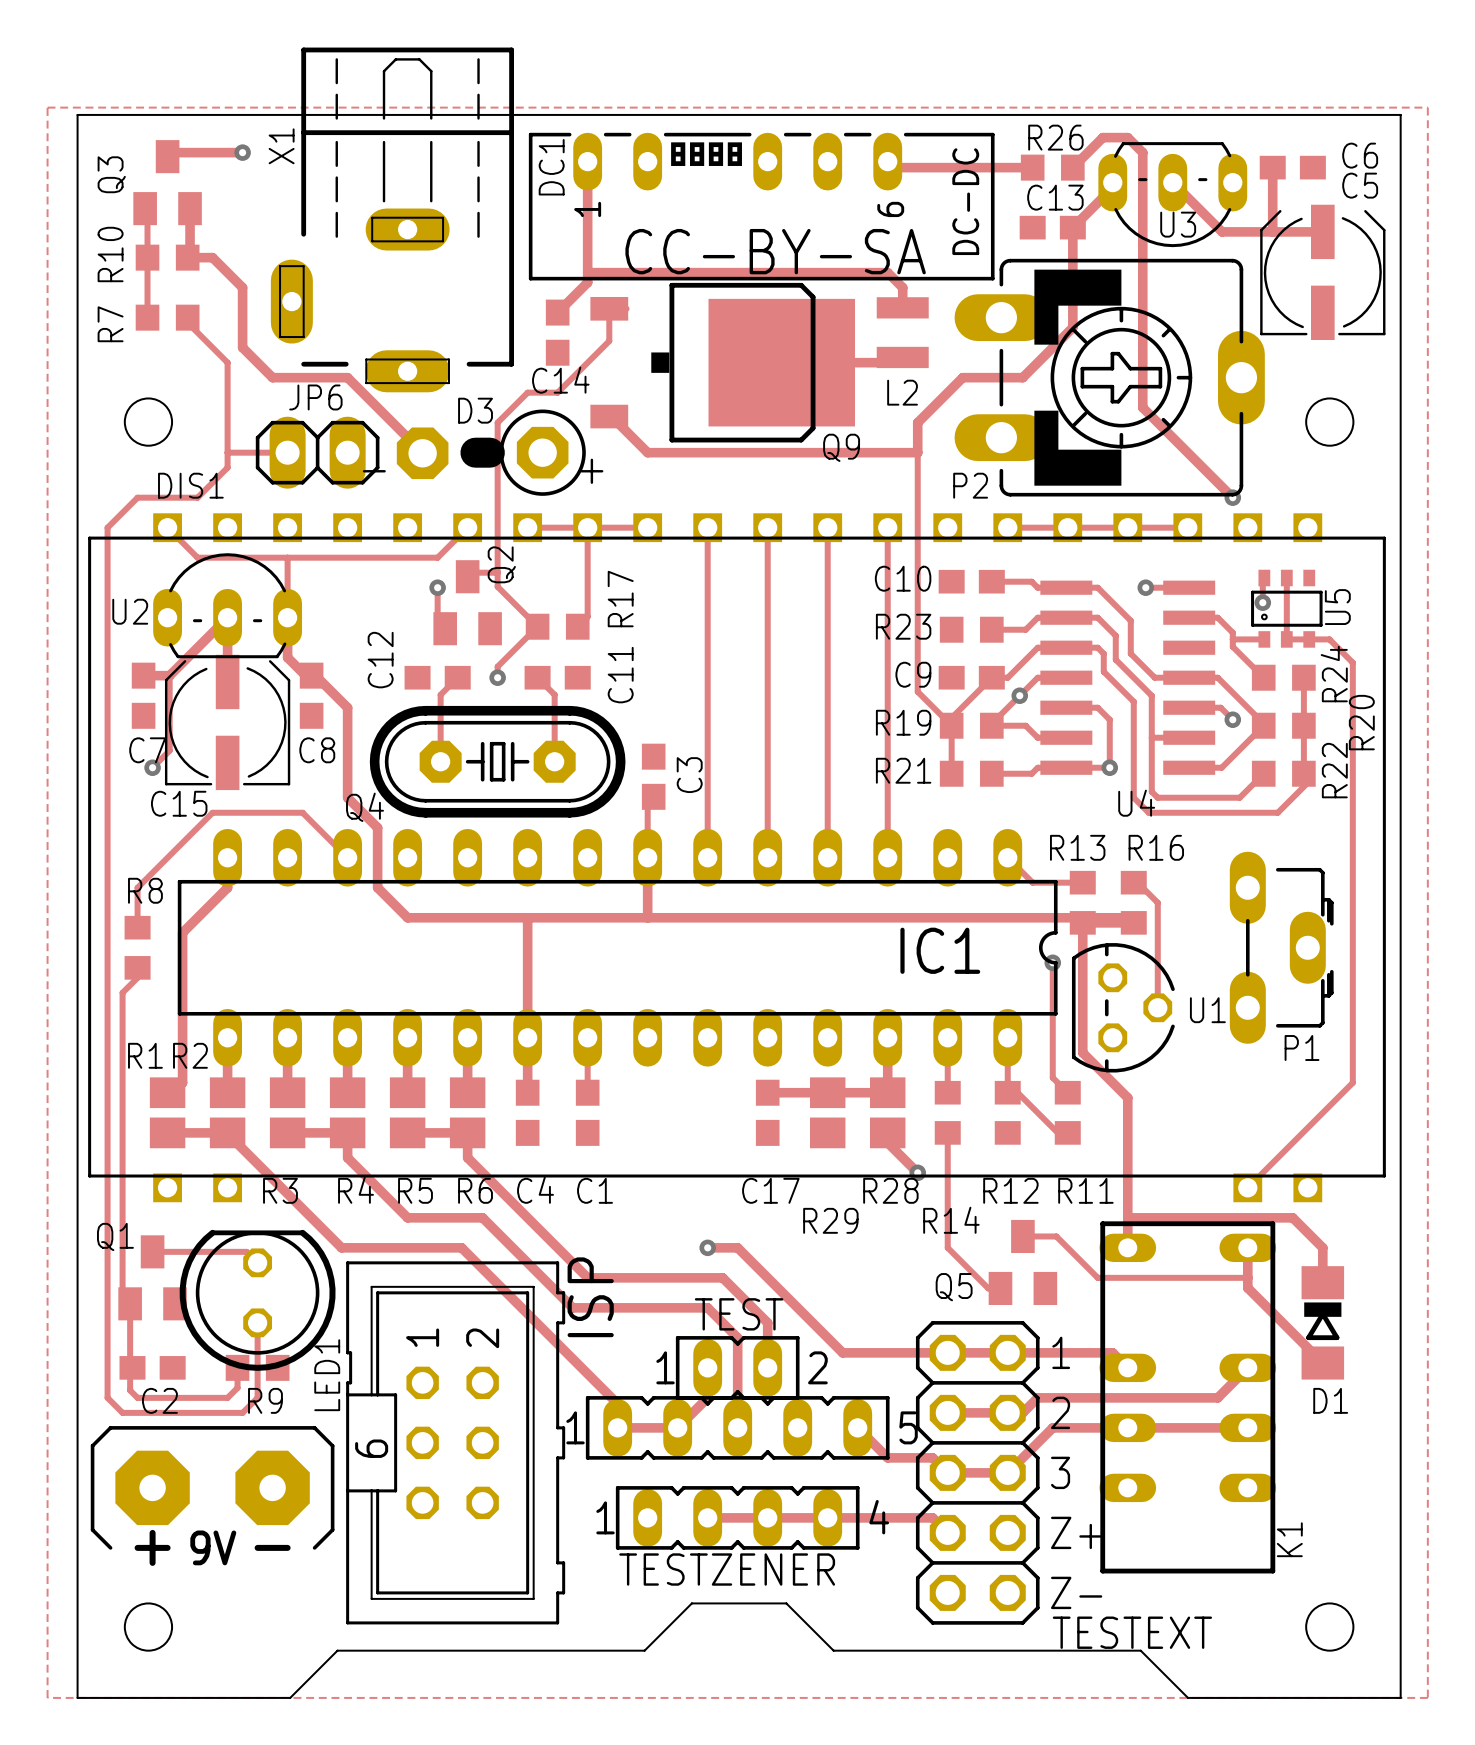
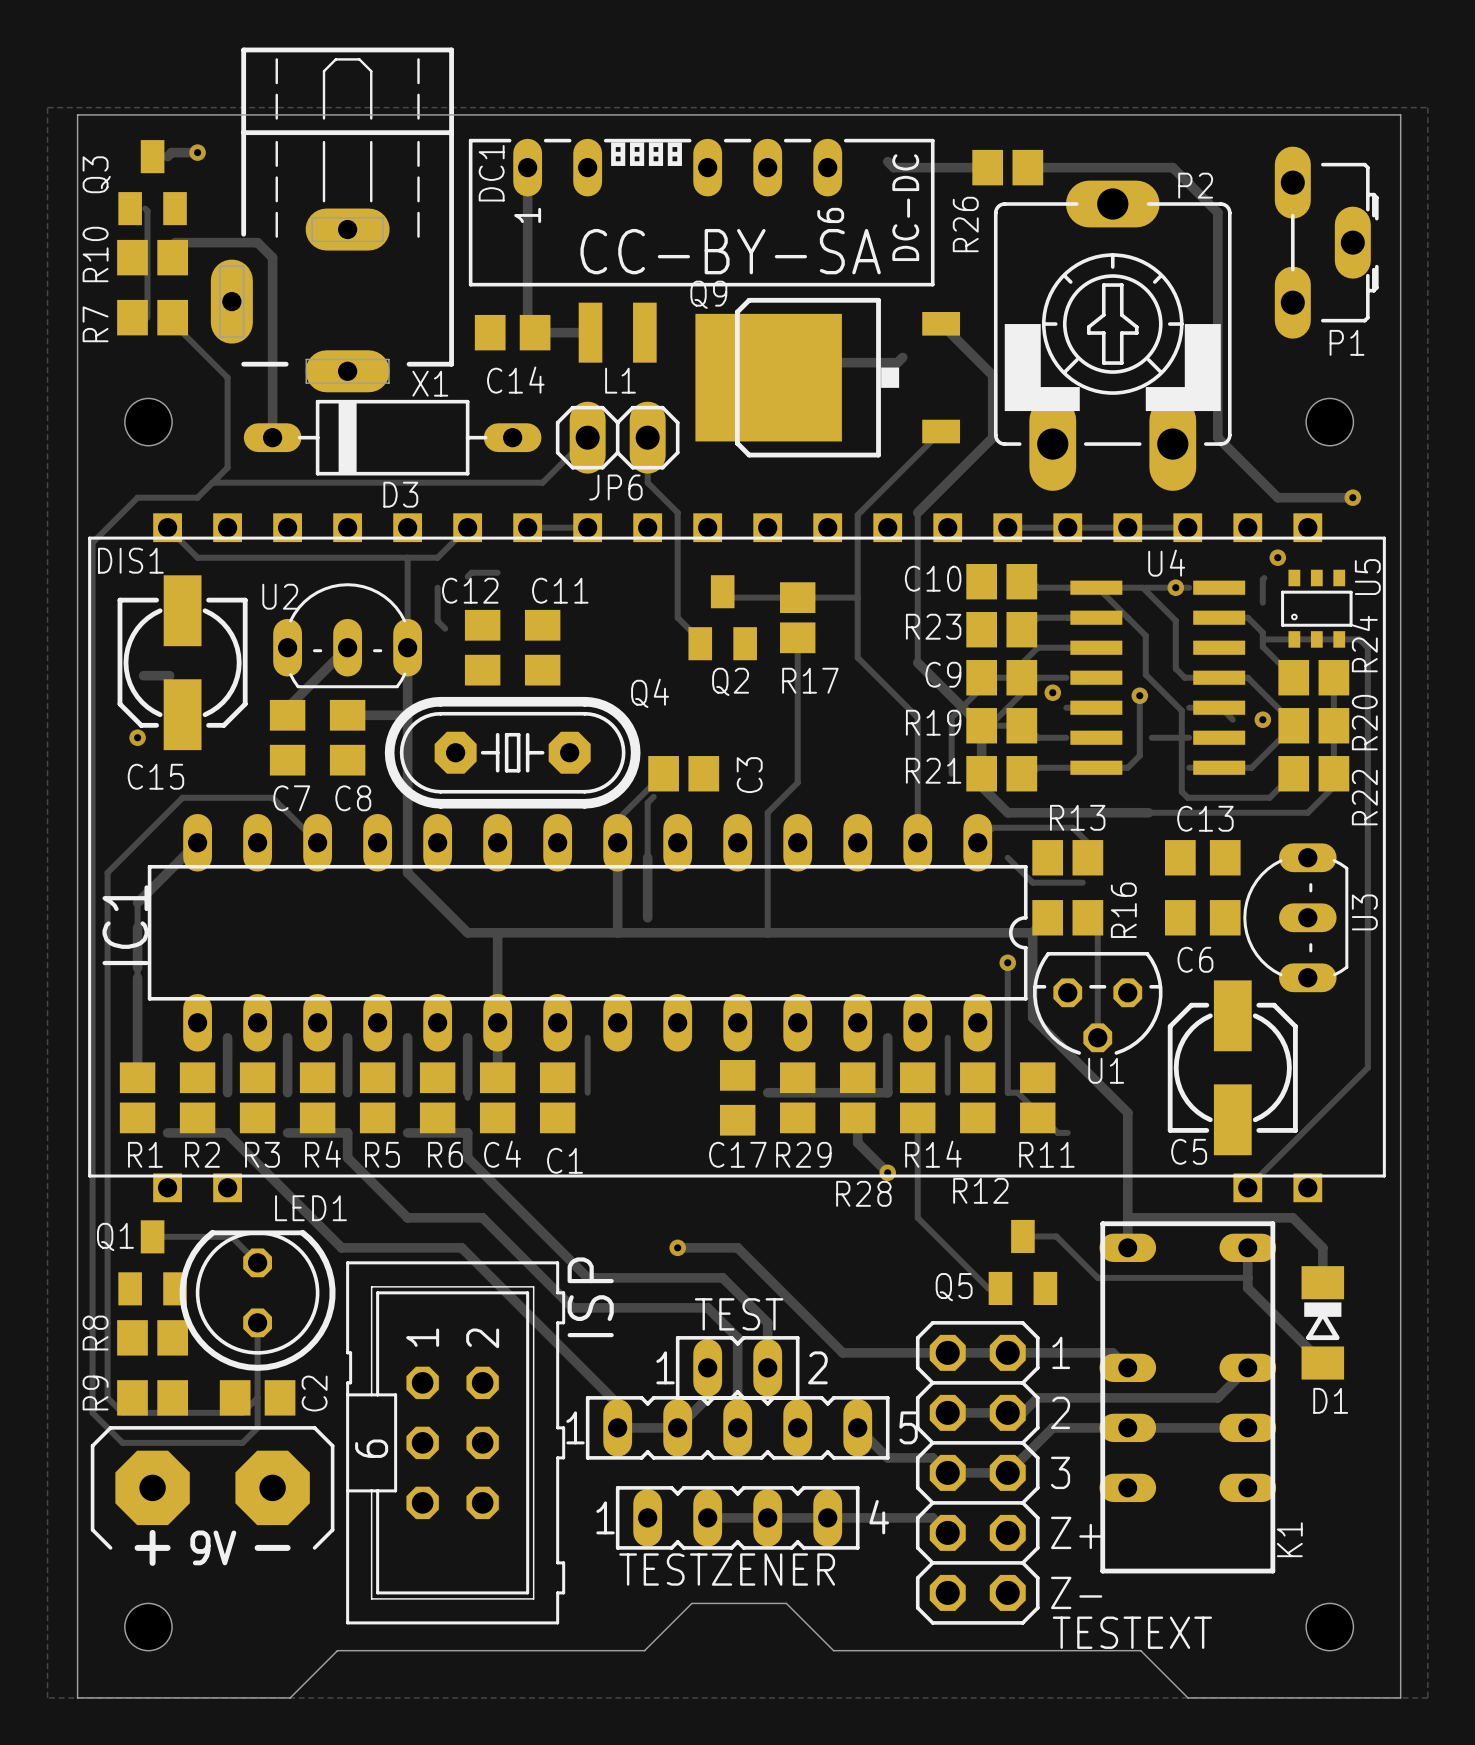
R26 name position: R26 (1055, 137) -> R26 (965, 224)
X1 name rotation: 0° (281, 146) -> 90° clockwise (430, 383)
X1 name position: X1 (281, 146) -> X1 (430, 383)
track: (197, 152) (242, 152) -> none
via position: (242, 152) -> (197, 152)
drawing position: (706, 154) -> (646, 154)
R26 footprint: [1020, 154, 1085, 181] -> [972, 149, 1044, 186]
C6 footprint: [1259, 155, 1326, 180] -> [1164, 900, 1241, 936]
C6 name position: C6 (1360, 155) -> C6 (1195, 959)
track: (587, 161) (587, 282) (557, 312) -> none
track: none -> (527, 167) (527, 325) (535, 332) (590, 332)
track: (987, 167) (1027, 167) -> none
track: none -> (1032, 167) (1172, 167) (1217, 212) (1217, 437) (1277, 497) (1352, 497)
track: (1072, 167) (1102, 137) (1127, 137) (1142, 152) (1142, 407) (1232, 497) -> none
track: (1272, 167) (1272, 231) -> none
Q3 position: (167, 182) -> (152, 182)
track: (1112, 182) (1112, 187) (1072, 227) (1072, 327) (1022, 377) (962, 377) (917, 422) (917, 452) -> none
track: (1172, 182) (1222, 231) (1322, 231) -> none
C5 name position: C5 (1360, 185) -> C5 (1189, 1151)
U3 rotation: 0° (1172, 194) -> 90° clockwise (1295, 917)
U3 position: (1172, 194) -> (1295, 917)
C5 footprint: [1260, 204, 1386, 340] -> [1167, 980, 1298, 1156]
DC1 position: (761, 206) -> (701, 212)
track: (190, 208) (190, 255) (187, 257) (212, 257) (242, 287) (242, 347) (272, 377) (347, 377) (422, 453) -> none
C13 footprint: [1019, 215, 1086, 240] -> [1164, 840, 1241, 876]
X1 position: (392, 219) -> (332, 219)
U3 name position: U3 (1178, 224) -> U3 (1364, 912)
track: none -> (175, 242) (257, 242) (272, 257) (272, 437)
R10 footprint: [135, 244, 200, 271] -> [117, 239, 189, 276]
text position: CC-BY-SA (775, 251) -> CC-BY-SA (730, 251)
R10 name position: R10 (110, 254) -> R10 (95, 254)
track: (587, 272) (887, 272) (902, 287) (902, 307) -> none
C14 footprint: [545, 299, 570, 366] -> [474, 314, 551, 351]
R7 footprint: [135, 304, 200, 331] -> [117, 299, 189, 336]
track: (626, 308) (609, 308) (609, 341) (557, 392) (527, 392) (497, 422) (497, 586) (537, 626) (497, 666) (497, 677) -> none
track: (187, 317) (187, 322) (227, 362) (227, 377) -> (172, 317) (172, 322) (227, 377)
R7 name position: R7 (110, 324) -> R7 (95, 324)
L1: none -> (617, 332)
L2: (902, 332) -> none
Q9 rotation: 0° (722, 362) -> 180° (827, 377)
P2 rotation: 0° (1109, 377) -> 90° counterclockwise (1112, 335)
JP6 name position: JP6 (315, 397) -> JP6 (615, 487)
D3 footprint: [396, 409, 586, 496] -> [243, 399, 542, 476]
D3 name position: D3 (475, 410) -> D3 (400, 494)
track: (609, 416) (611, 416) (647, 452) (917, 452) -> none
track: none -> (941, 431) (857, 514) (857, 657) (917, 717) (917, 842)
track: none -> (587, 437) (542, 482) (212, 482)
track: none -> (647, 437) (647, 482) (677, 512) (677, 617) (700, 640) (700, 643)
track: (227, 452) (287, 452) -> (347, 715) (407, 715)
JP6 position: (317, 452) -> (617, 437)
track: (917, 452) (917, 512) -> (941, 323) (992, 375) (992, 437) (917, 512)
DIS1 name position: DIS1 (190, 485) -> DIS1 (130, 560)
P2 name position: P2 (970, 485) -> P2 (1195, 185)
via: (1232, 497) -> none
via: none -> (1352, 497)
track: (107, 527) (107, 872) -> (317, 842) (272, 797) (182, 797) (107, 872)
track: none -> (107, 527) (92, 542) (92, 1412) (122, 1442) (242, 1442) (257, 1427) (257, 1397)
track: (647, 527) (587, 527) (587, 616) (577, 626) -> none
track: (707, 527) (707, 857) -> none
track: (767, 527) (767, 812) -> (797, 637) (797, 782) (767, 812)
track: (827, 527) (827, 857) -> none
track: (887, 527) (887, 857) -> none
track: (287, 557) (287, 657) (305, 675) (315, 675) (347, 707) (347, 797) (377, 827) (377, 887) (407, 917) (1133, 917) (1133, 922) (1082, 922) -> none
track: none -> (407, 557) (407, 872) (467, 932) (1032, 932)
via: none -> (1277, 557)
Q2 name rotation: 0° (501, 564) -> 90° clockwise (730, 681)
Q2 name position: Q2 (501, 564) -> Q2 (730, 681)
C10 footprint: [938, 569, 1005, 594] -> [966, 563, 1038, 600]
track: (1286, 578) (1286, 639) -> (1264, 639) (1286, 639)
track: (991, 581) (1021, 581) -> none
via: (437, 587) -> none
via position: (1145, 587) -> (1175, 587)
track: none -> (722, 591) (728, 597) (857, 597)
R17 name position: R17 (620, 599) -> R17 (810, 680)
Q2 position: (467, 602) -> (722, 617)
via: (1262, 602) -> none
U2 position: (227, 605) -> (347, 635)
U5 name position: U5 (1337, 607) -> U5 (1367, 577)
U5 position: (1286, 608) -> (1316, 608)
U2 name position: U2 (130, 611) -> U2 (280, 596)
R17 footprint: [525, 613, 590, 640] -> [779, 582, 816, 654]
R23 footprint: [939, 616, 1004, 643] -> [966, 612, 1038, 648]
track: (1097, 617) (1115, 635) (1115, 659) (1151, 695) (1151, 791) (1157, 797) (1187, 797) -> (1130, 620) (1145, 635) (1145, 674) (1181, 710) (1181, 791) (1187, 797)
track: (1189, 617) (1217, 617) (1232, 632) (1232, 646) (1263, 677) -> (1219, 617) (1247, 617) (1262, 632) (1262, 646) (1293, 677)
track: (1130, 620) (1130, 653) (1154, 677) (1184, 677) -> (1097, 587) (1142, 587) (1175, 620) (1175, 668) (1184, 677)
track: (991, 629) (1021, 629) -> none
track: (1232, 639) (1262, 639) -> none
track: (1329, 639) (1352, 662) (1352, 1082) -> (1329, 639) (1359, 639) (1367, 647) (1367, 1067) (1352, 1082)
track: none -> (347, 647) (287, 707) (287, 715)
track: (1096, 647) (1103, 653) (1103, 671) (1133, 701) (1133, 797) (1148, 812) -> (917, 662) (981, 726) (981, 786) (1007, 812) (1148, 812)
C15 footprint: [164, 654, 291, 791] -> [117, 575, 248, 751]
C12 name position: C12 (380, 660) -> C12 (470, 590)
C7 footprint: [131, 662, 156, 729] -> [269, 699, 306, 776]
C8 footprint: [299, 662, 324, 729] -> [329, 699, 366, 776]
track: (917, 662) (917, 691) (951, 725) -> none
R24 footprint: [1251, 664, 1316, 691] -> [1278, 660, 1350, 696]
C12 footprint: [404, 665, 471, 690] -> [464, 609, 501, 686]
C11 footprint: [524, 665, 591, 690] -> [524, 609, 561, 686]
C9 footprint: [938, 665, 1005, 690] -> [966, 660, 1038, 696]
C11 name position: C11 (620, 675) -> C11 (560, 590)
track: (457, 677) (440, 694) (440, 761) -> none
via: (497, 677) -> none
track: (537, 677) (554, 694) (554, 761) -> none
U4 position: (1127, 677) -> (1157, 677)
track: (1217, 677) (1263, 723) (1221, 767) -> (1217, 677) (1247, 677) (1293, 723) (1251, 767) (1221, 767)
track: (1303, 677) (1303, 773) (1307, 771) (1307, 782) (1277, 812) -> (1333, 677) (1333, 786) (1307, 812) (1277, 812)
track: (227, 681) (227, 617) (169, 675) (169, 750) (152, 767) -> none
via position: (1019, 695) -> (1052, 692)
via: none -> (1139, 695)
track: (1097, 707) (1109, 719) (1109, 767) -> (1139, 695) (1139, 755) (1127, 767) (1109, 767)
R19 footprint: [939, 712, 1004, 739] -> [966, 708, 1038, 744]
R20 footprint: [1251, 712, 1316, 739] -> [1278, 708, 1350, 744]
via position: (1232, 719) -> (1262, 719)
C3 footprint: [641, 743, 666, 810] -> [648, 756, 720, 792]
R21 footprint: [939, 760, 1004, 787] -> [966, 756, 1038, 792]
R22 footprint: [1251, 760, 1316, 787] -> [1278, 756, 1350, 792]
Q4 position: (497, 761) -> (512, 752)
via position: (152, 767) -> (137, 737)
via: (1109, 767) -> none
track: none -> (663, 773) (617, 819) (617, 932)
track: (991, 773) (1021, 773) -> (677, 1247) (707, 1247)
track: (1263, 773) (1239, 797) -> (1293, 773) (1269, 797) (1239, 797)
U4 name position: U4 (1136, 803) -> U4 (1166, 563)
Q4 name position: Q4 (365, 807) -> Q4 (650, 693)
track: none -> (977, 842) (992, 827) (1072, 827) (1087, 842) (1087, 857)
R16 name position: R16 (1156, 847) -> R16 (1123, 910)
track: (227, 857) (227, 887) (182, 932) (182, 1082) (167, 1097) (167, 1092) -> none
track: (347, 857) (302, 812) (212, 812) (137, 887) (137, 902) -> (197, 842) (137, 902)
track: none -> (767, 857) (767, 932)
R13 footprint: [1069, 870, 1096, 935] -> [1032, 840, 1104, 876]
R16 footprint: [1120, 870, 1147, 935] -> [1032, 900, 1104, 936]
track: (1133, 882) (1137, 882) (1157, 902) (1157, 1007) -> none
R8 name position: R8 (145, 890) -> R8 (95, 1332)
R8 footprint: [124, 915, 151, 980] -> [117, 1320, 189, 1356]
track: (527, 917) (527, 1092) -> none
track: (1082, 917) (1082, 1052) (1127, 1097) (1127, 1112) -> (1032, 932) (1032, 1017) (1127, 1112)
track: none -> (137, 927) (137, 967)
track: none -> (1087, 927) (1087, 917) (1097, 927) (1097, 1037)
track: none -> (497, 932) (497, 1077)
IC1 position: (617, 947) -> (587, 932)
P1 position: (1281, 947) -> (1326, 242)
IC1 name rotation: 0° (940, 950) -> 90° counterclockwise (125, 925)
IC1 name position: IC1 (940, 950) -> IC1 (125, 925)
track: none -> (1007, 962) (1007, 1037)
track: (1052, 962) (1052, 1077) (1067, 1092) -> none
via position: (1052, 962) -> (1007, 962)
track: (137, 977) (122, 992) (122, 1296) (130, 1303) (130, 1390) (137, 1397) (227, 1397) (237, 1387) (237, 1367) -> (137, 977) (137, 1077)
U1 rotation: 0° (1123, 1007) -> 90° clockwise (1097, 1003)
R1 name position: R1 (145, 1055) -> R1 (145, 1154)
R2 name position: R2 (190, 1055) -> R2 (202, 1154)
C4 footprint: [515, 1079, 540, 1146] -> [479, 1062, 516, 1134]
C1 footprint: [575, 1079, 600, 1146] -> [539, 1062, 576, 1134]
C17 footprint: [755, 1079, 780, 1146] -> [719, 1060, 756, 1136]
R14 footprint: [934, 1080, 961, 1145] -> [900, 1062, 936, 1134]
R12 footprint: [994, 1080, 1021, 1145] -> [960, 1062, 996, 1134]
R11 footprint: [1054, 1080, 1081, 1145] -> [1020, 1062, 1056, 1134]
R1 position: (167, 1112) -> (137, 1097)
R2 position: (227, 1112) -> (197, 1097)
R3 position: (287, 1112) -> (257, 1097)
R4 position: (347, 1112) -> (317, 1097)
R5 position: (407, 1112) -> (377, 1097)
R6 position: (467, 1112) -> (437, 1097)
R29 position: (827, 1112) -> (797, 1097)
R28 position: (887, 1112) -> (857, 1097)
track: none -> (857, 1117) (857, 1142) (887, 1172)
track: (887, 1132) (887, 1142) (917, 1172) -> none
track: (947, 1132) (947, 1247) -> (917, 1117) (917, 1217) (947, 1247)
via position: (917, 1172) -> (887, 1172)
R3 name position: R3 (280, 1190) -> R3 (262, 1154)
R4 name position: R4 (356, 1190) -> R4 (322, 1154)
R5 name position: R5 (415, 1190) -> R5 (382, 1154)
R6 name position: R6 (475, 1190) -> R6 (445, 1154)
R28 name position: R28 (890, 1190) -> R28 (863, 1193)
R29 name position: R29 (830, 1220) -> R29 (803, 1154)
R14 name position: R14 (951, 1220) -> R14 (933, 1154)
via position: (707, 1247) -> (677, 1247)
track: (152, 1251) (246, 1251) -> (152, 1236) (231, 1236) (246, 1251)
Q1 position: (152, 1277) -> (152, 1262)
R9 footprint: [225, 1354, 290, 1381] -> [117, 1380, 189, 1416]
C2 footprint: [119, 1356, 186, 1380] -> [219, 1380, 296, 1416]
LED1 name rotation: 0° (327, 1375) -> 90° clockwise (310, 1208)
LED1 name position: LED1 (327, 1375) -> LED1 (310, 1208)
C2 name position: C2 (159, 1400) -> C2 (314, 1393)
R9 name position: R9 (265, 1400) -> R9 (95, 1393)

